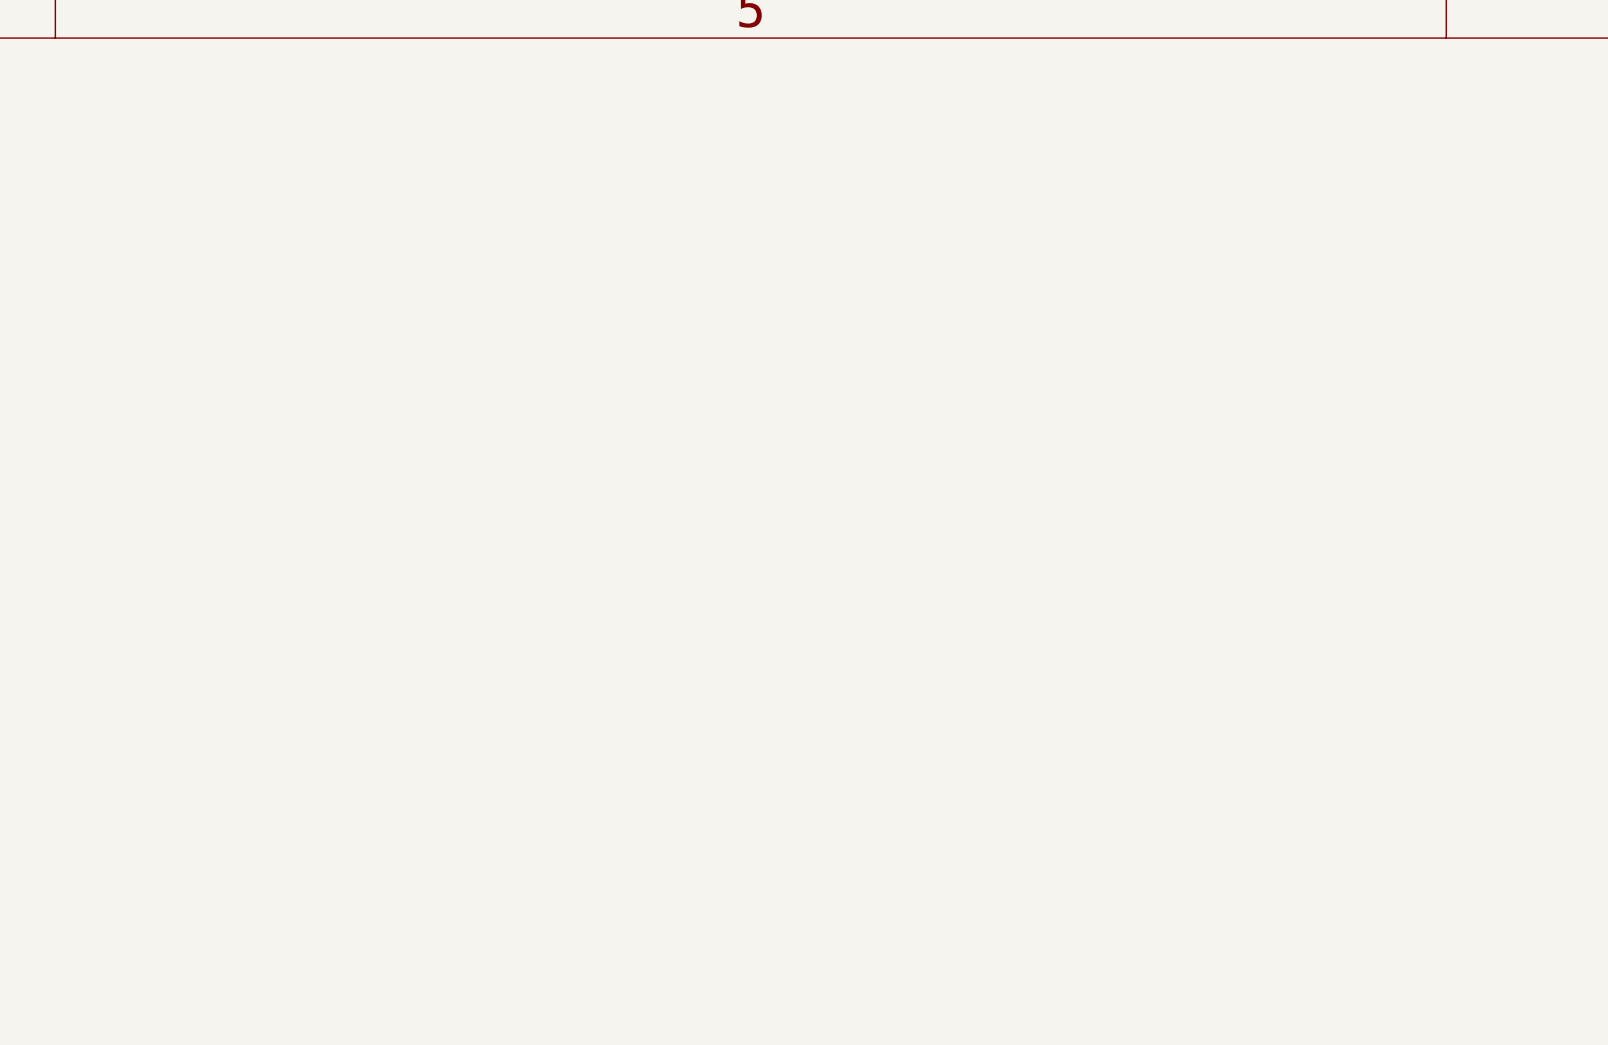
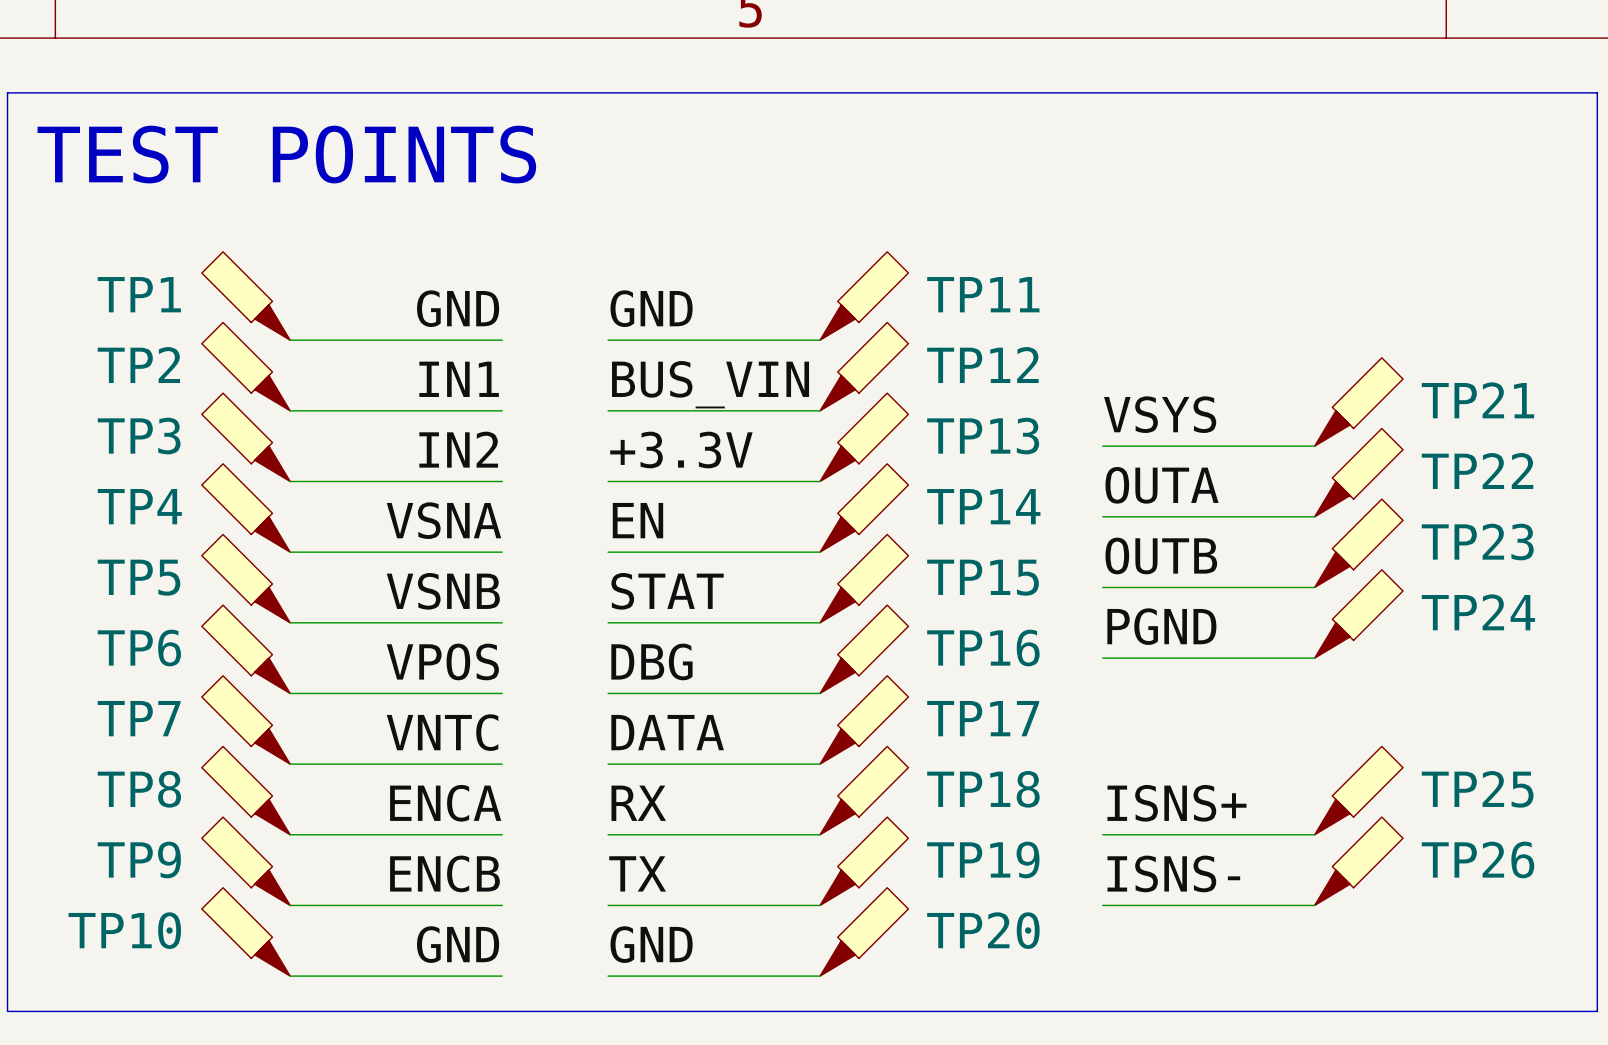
line: none -> (7, 92) (1597, 92) (1597, 1011) (7, 1011) (7, 92)
text: none -> TEST POINTS (286, 154)
TP1: none -> (245, 296)
TP11: none -> (864, 296)
label: none -> GND (458, 308)
label: none -> GND (651, 308)
wire: none -> (290, 340) (502, 340)
wire: none -> (608, 340) (820, 340)
TP2: none -> (245, 366)
TP12: none -> (864, 366)
label: none -> IN1 (459, 379)
label: none -> BUS_VIN (710, 384)
TP21: none -> (1358, 402)
wire: none -> (290, 410) (502, 410)
wire: none -> (608, 410) (820, 410)
label: none -> VSYS (1160, 414)
TP3: none -> (245, 437)
TP13: none -> (864, 437)
wire: none -> (1102, 446) (1314, 446)
label: none -> IN2 (458, 449)
label: none -> +3.3V (681, 449)
TP22: none -> (1358, 472)
wire: none -> (290, 481) (502, 481)
wire: none -> (608, 481) (820, 481)
label: none -> OUTA (1162, 485)
TP4: none -> (245, 507)
TP14: none -> (864, 507)
wire: none -> (1102, 516) (1314, 516)
label: none -> VSNA (444, 520)
label: none -> EN (637, 520)
TP23: none -> (1358, 543)
wire: none -> (290, 552) (502, 552)
wire: none -> (608, 552) (820, 552)
label: none -> OUTB (1161, 555)
TP5: none -> (245, 578)
TP15: none -> (864, 578)
wire: none -> (1102, 587) (1314, 587)
label: none -> VSNB (443, 591)
label: none -> STAT (667, 591)
TP24: none -> (1358, 613)
wire: none -> (290, 622) (502, 622)
wire: none -> (608, 622) (820, 622)
label: none -> PGND (1161, 626)
TP6: none -> (245, 649)
TP16: none -> (864, 649)
wire: none -> (1102, 658) (1314, 658)
label: none -> VPOS (442, 661)
label: none -> DBG (651, 661)
wire: none -> (290, 693) (502, 693)
wire: none -> (608, 693) (820, 693)
TP7: none -> (245, 719)
TP17: none -> (864, 719)
label: none -> VNTC (442, 732)
label: none -> DATA (667, 732)
wire: none -> (290, 764) (502, 764)
wire: none -> (608, 764) (820, 764)
TP8: none -> (245, 790)
TP18: none -> (864, 790)
TP25: none -> (1358, 790)
label: none -> ENCA (445, 803)
label: none -> RX (638, 803)
label: none -> ISNS+ (1176, 803)
wire: none -> (290, 834) (502, 834)
wire: none -> (608, 834) (820, 834)
wire: none -> (1102, 834) (1314, 834)
TP9: none -> (245, 861)
TP19: none -> (864, 861)
TP26: none -> (1358, 861)
label: none -> ENCB (444, 873)
label: none -> TX (637, 873)
label: none -> ISNS- (1173, 873)
wire: none -> (290, 905) (502, 905)
wire: none -> (608, 905) (820, 905)
wire: none -> (1102, 905) (1314, 905)
TP10: none -> (245, 931)
TP20: none -> (864, 931)
label: none -> GND (458, 944)
label: none -> GND (651, 944)
wire: none -> (290, 976) (502, 976)
wire: none -> (608, 976) (820, 976)

